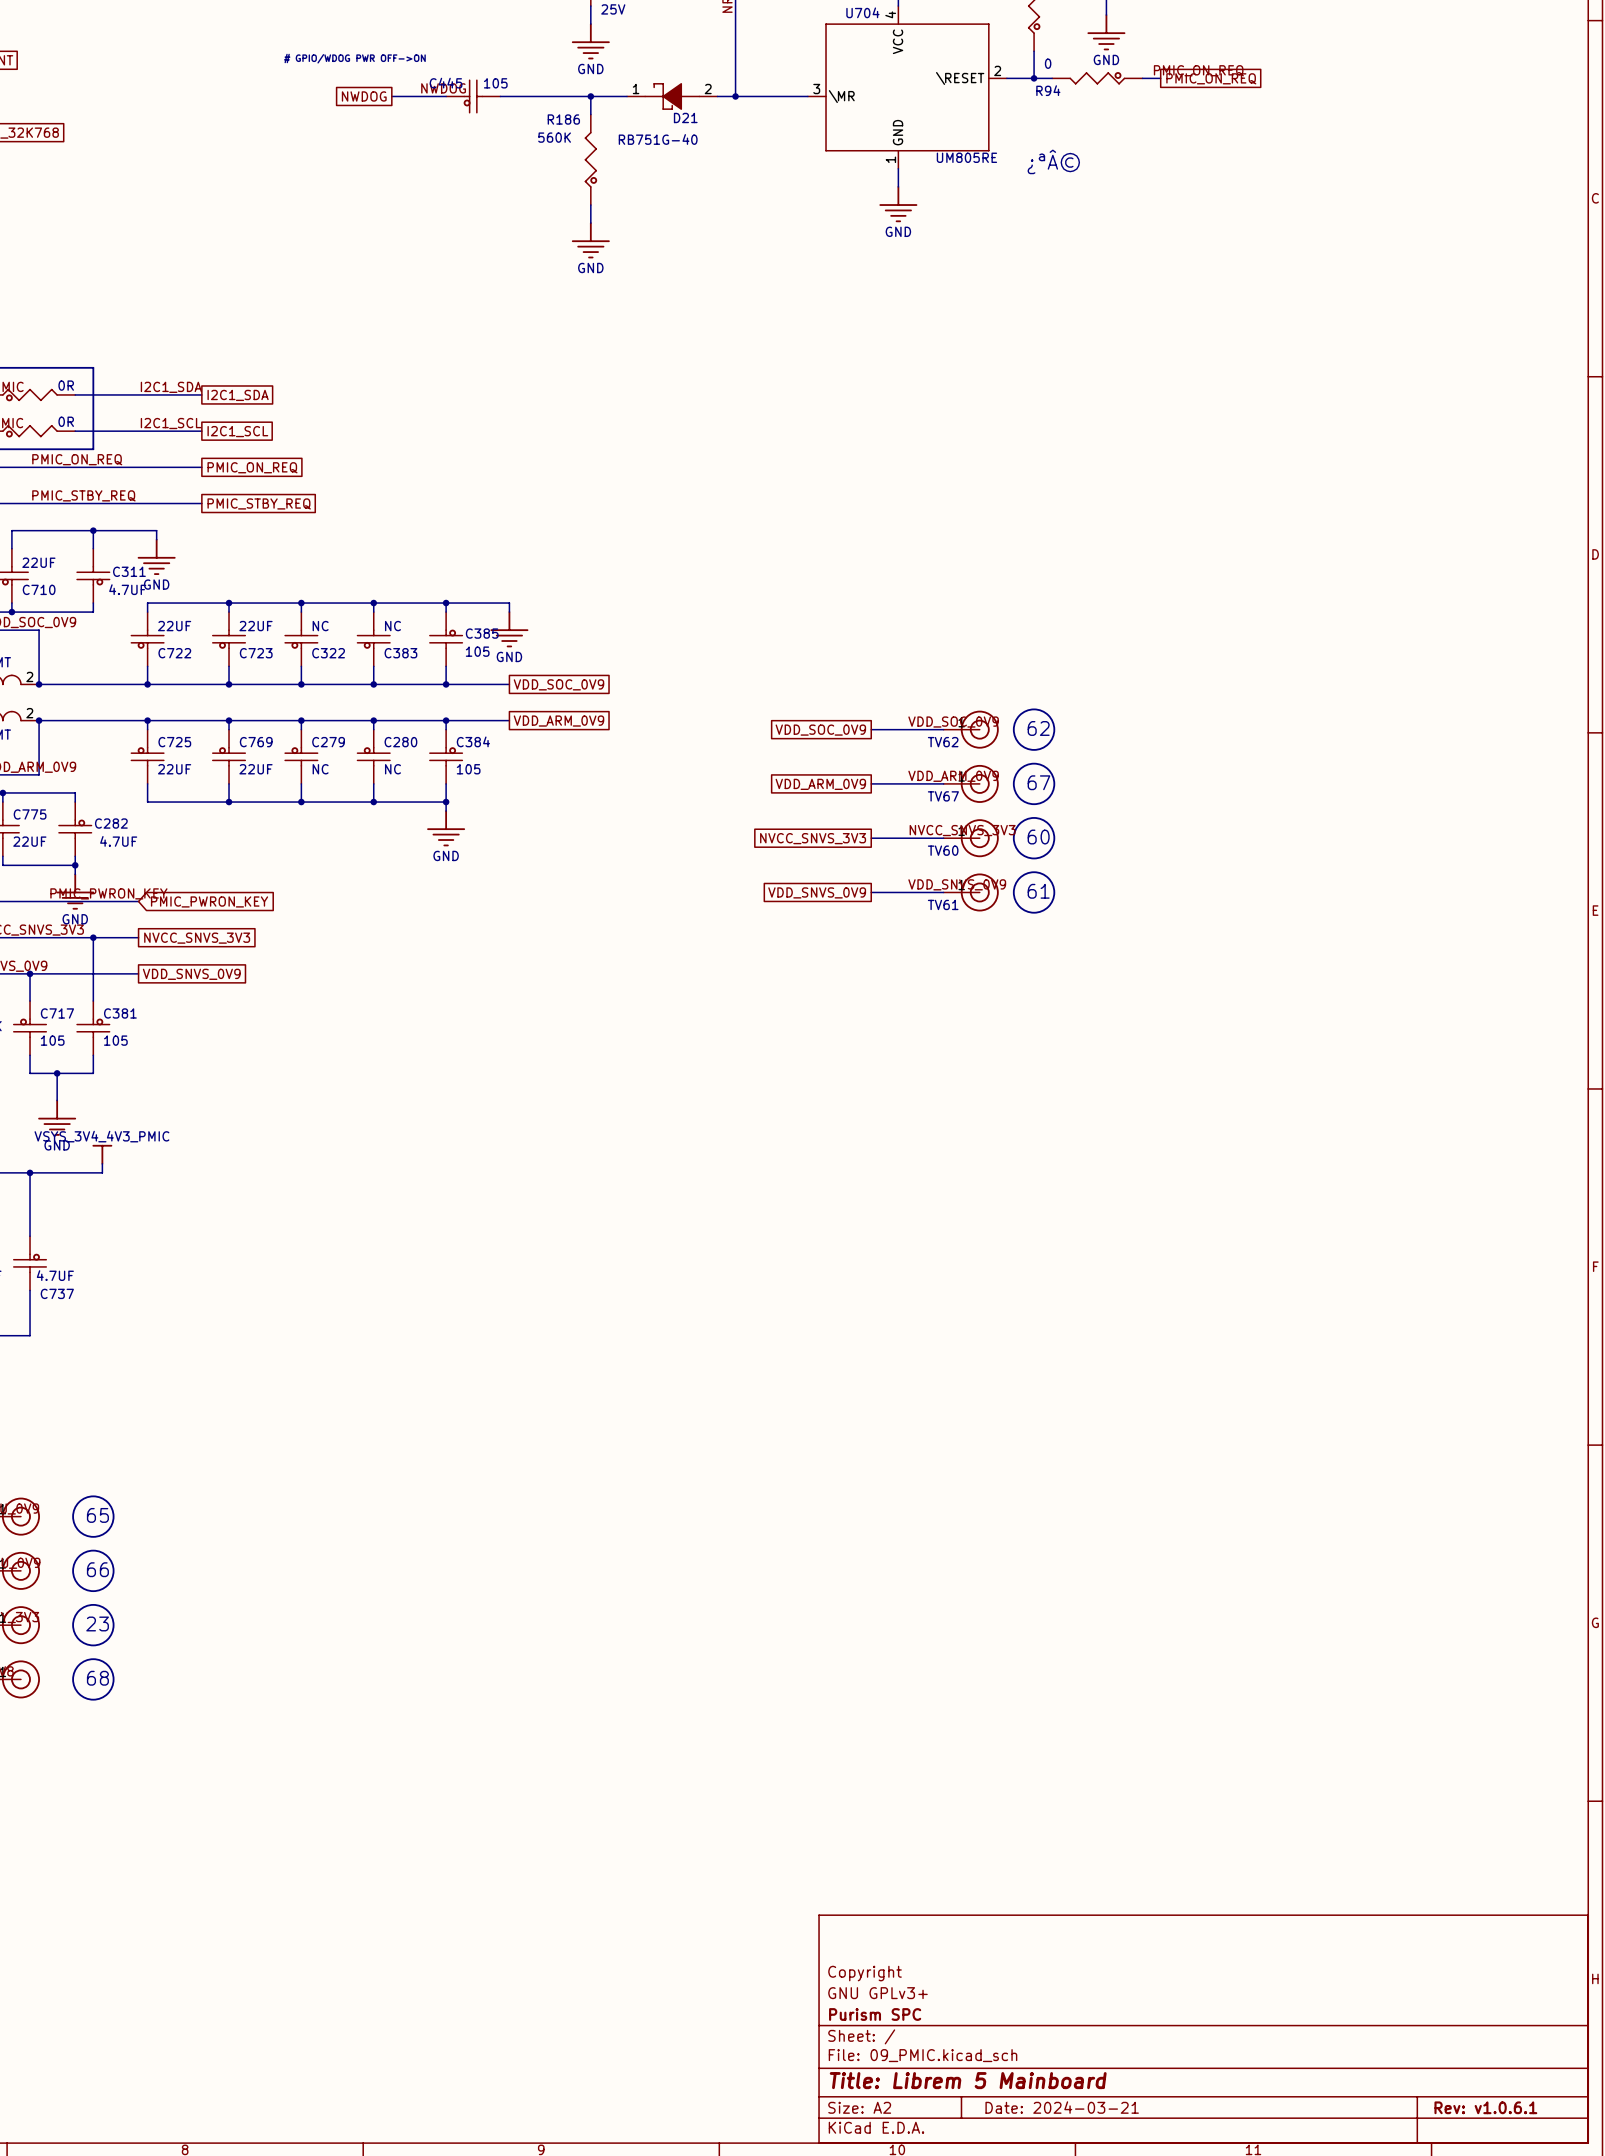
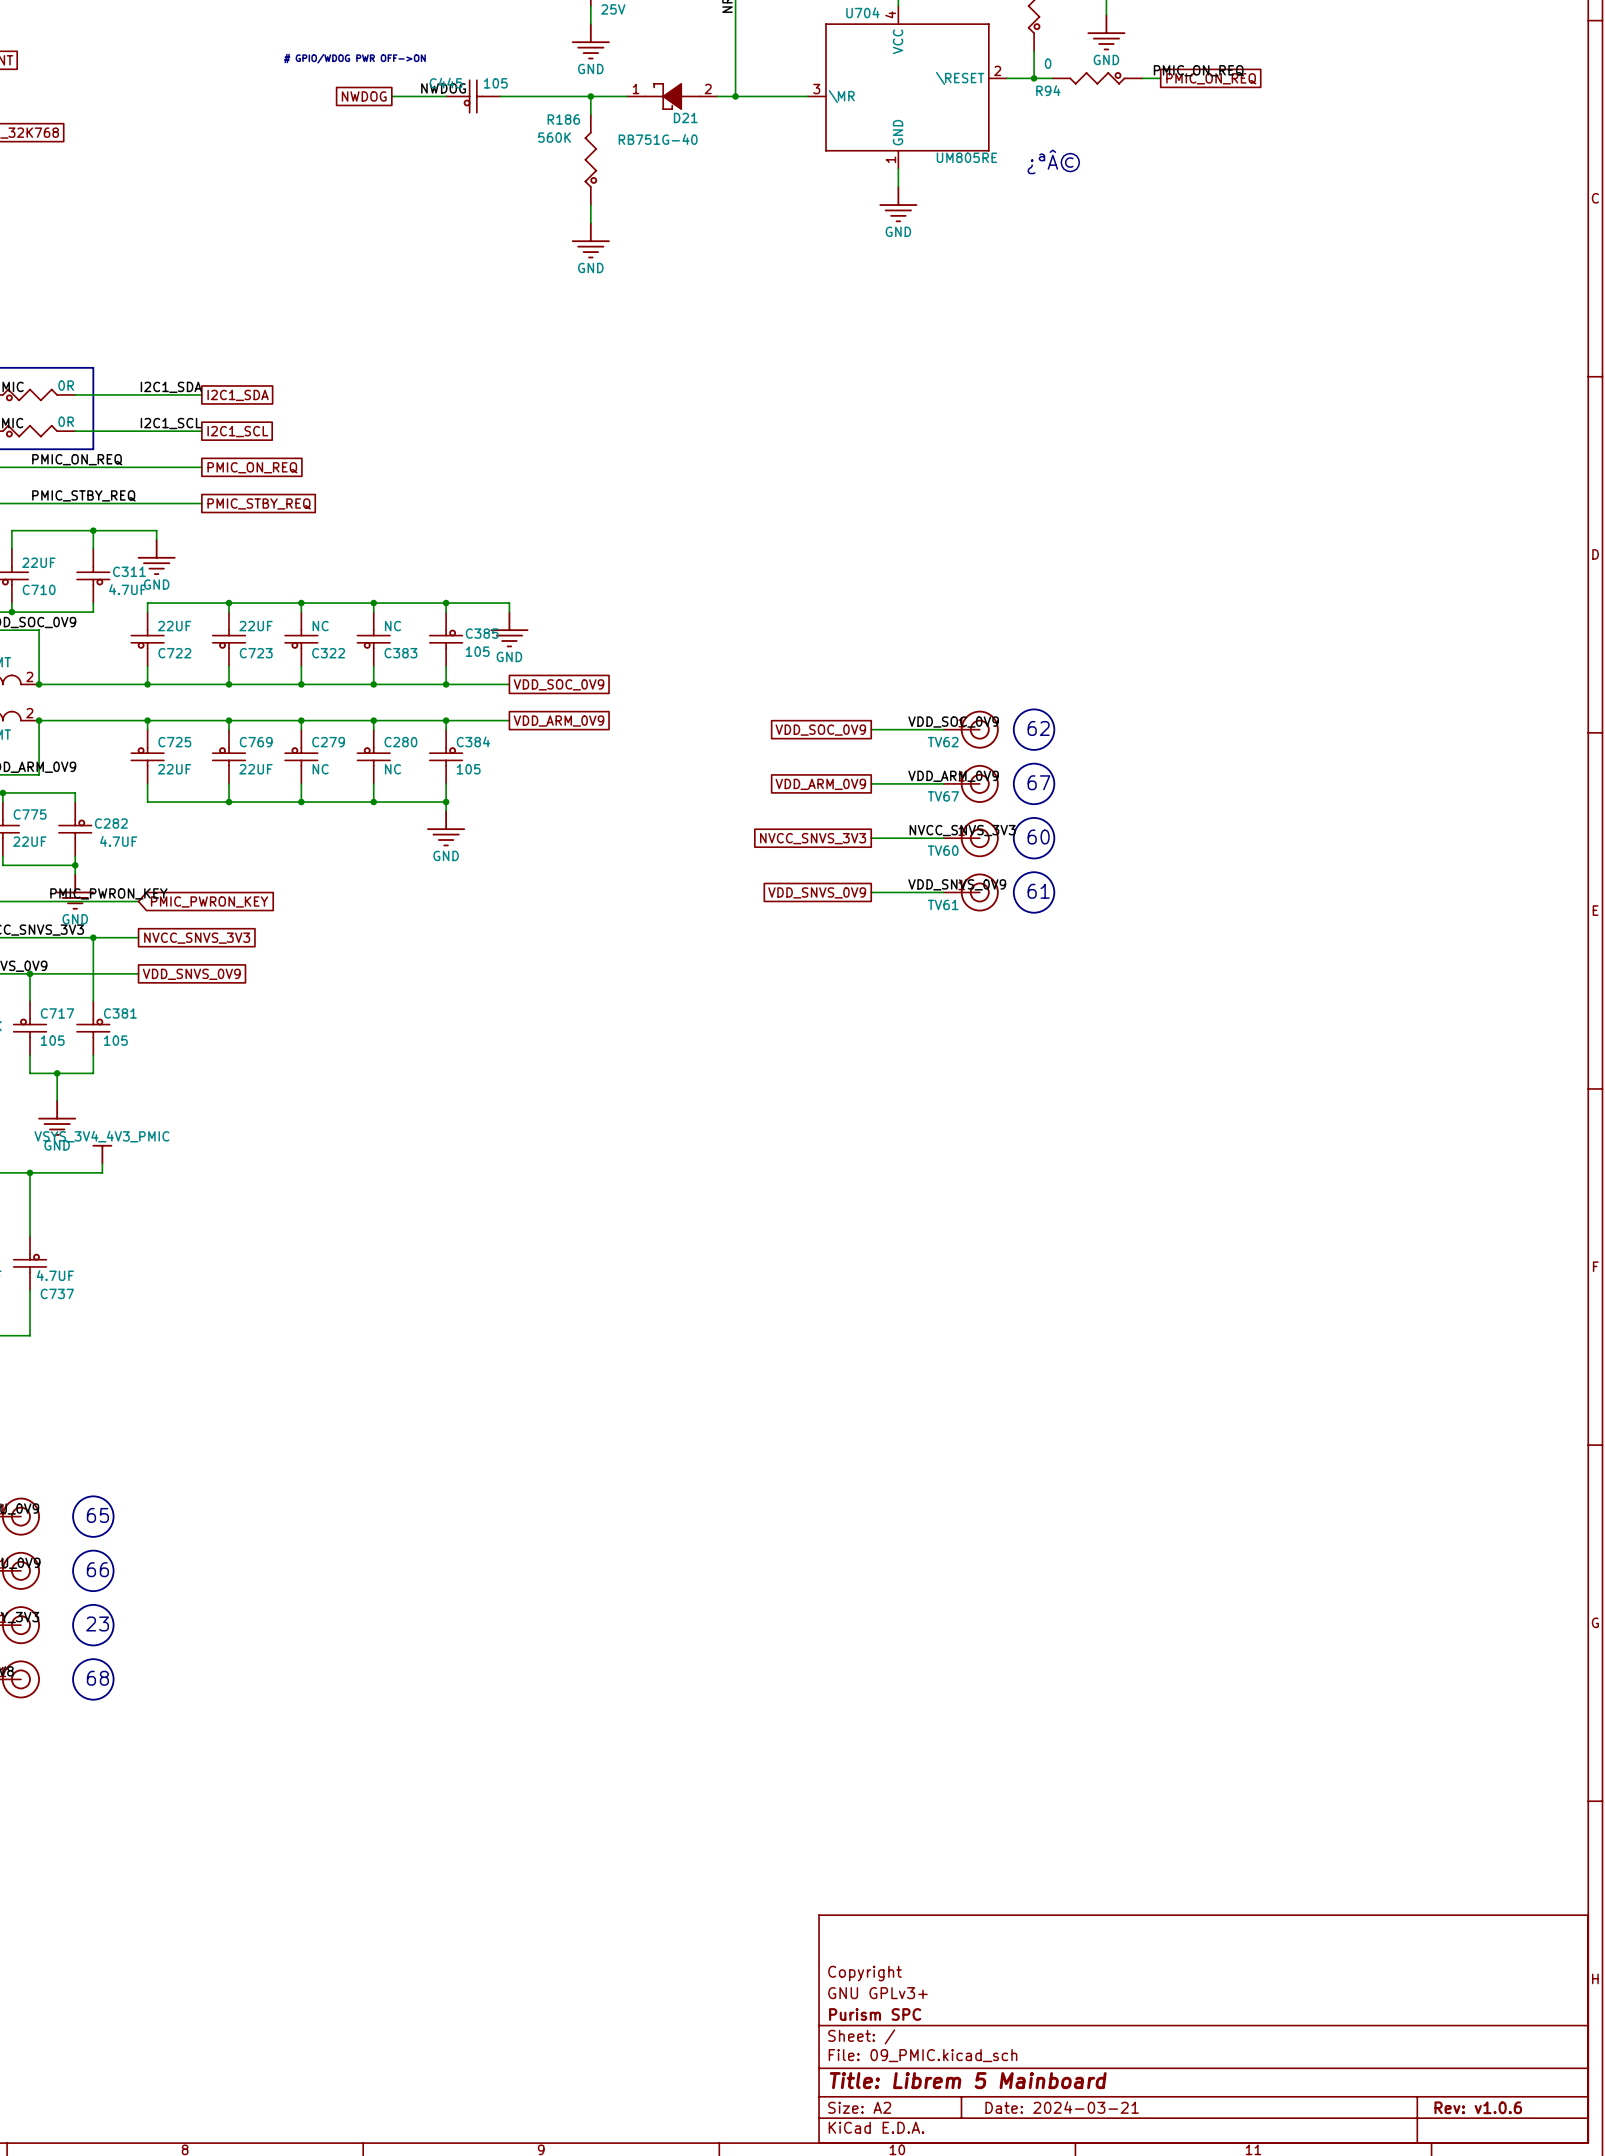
title block: Rev: v1.0.6.1 (1485, 2107) -> Rev: v1.0.6 (1478, 2107)

